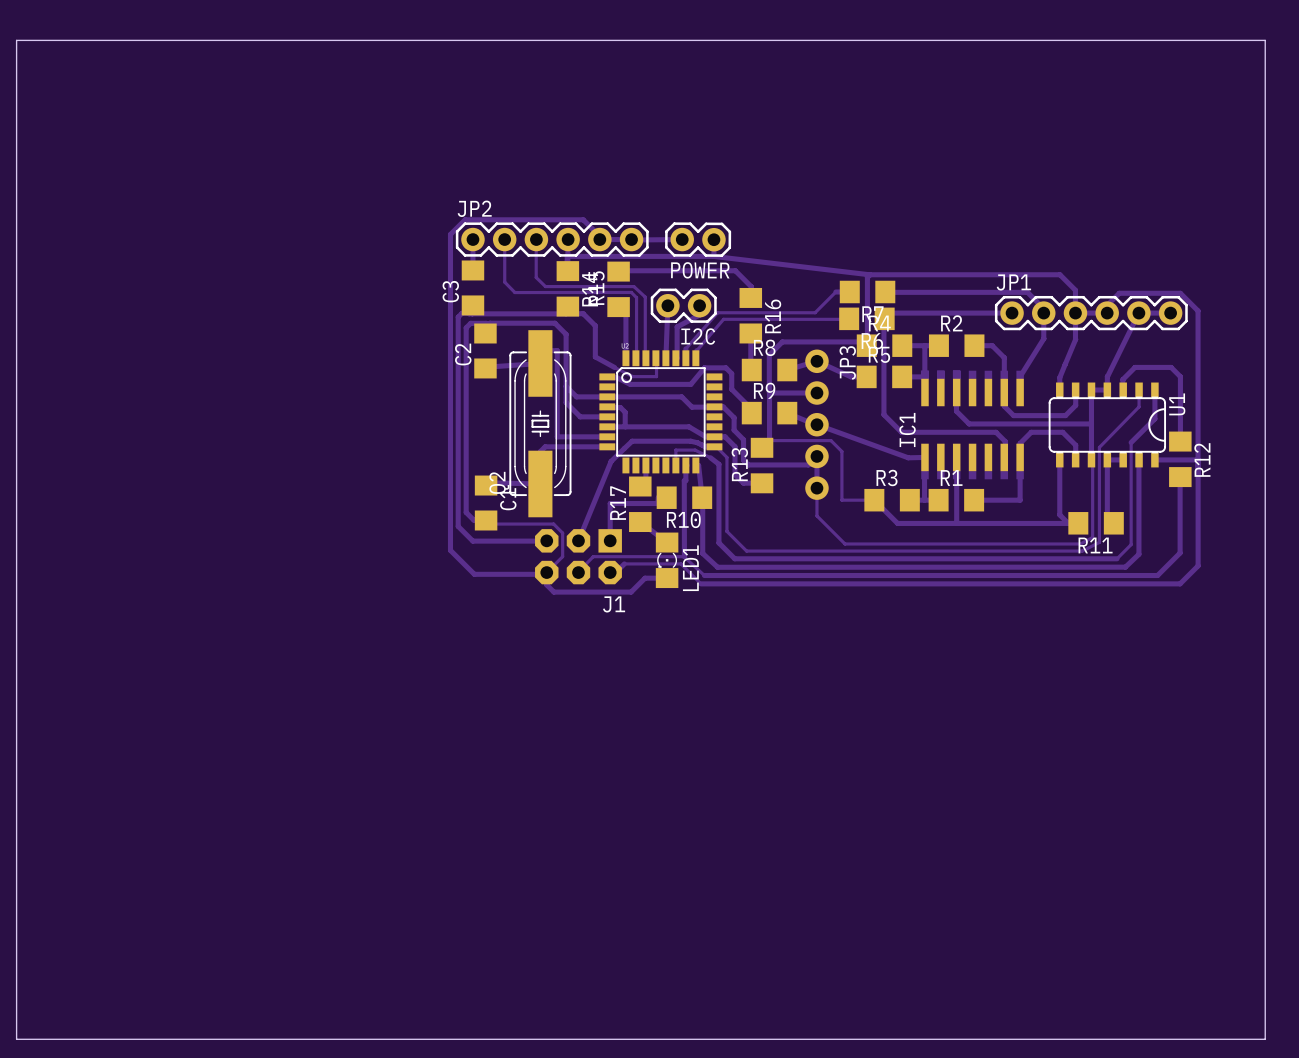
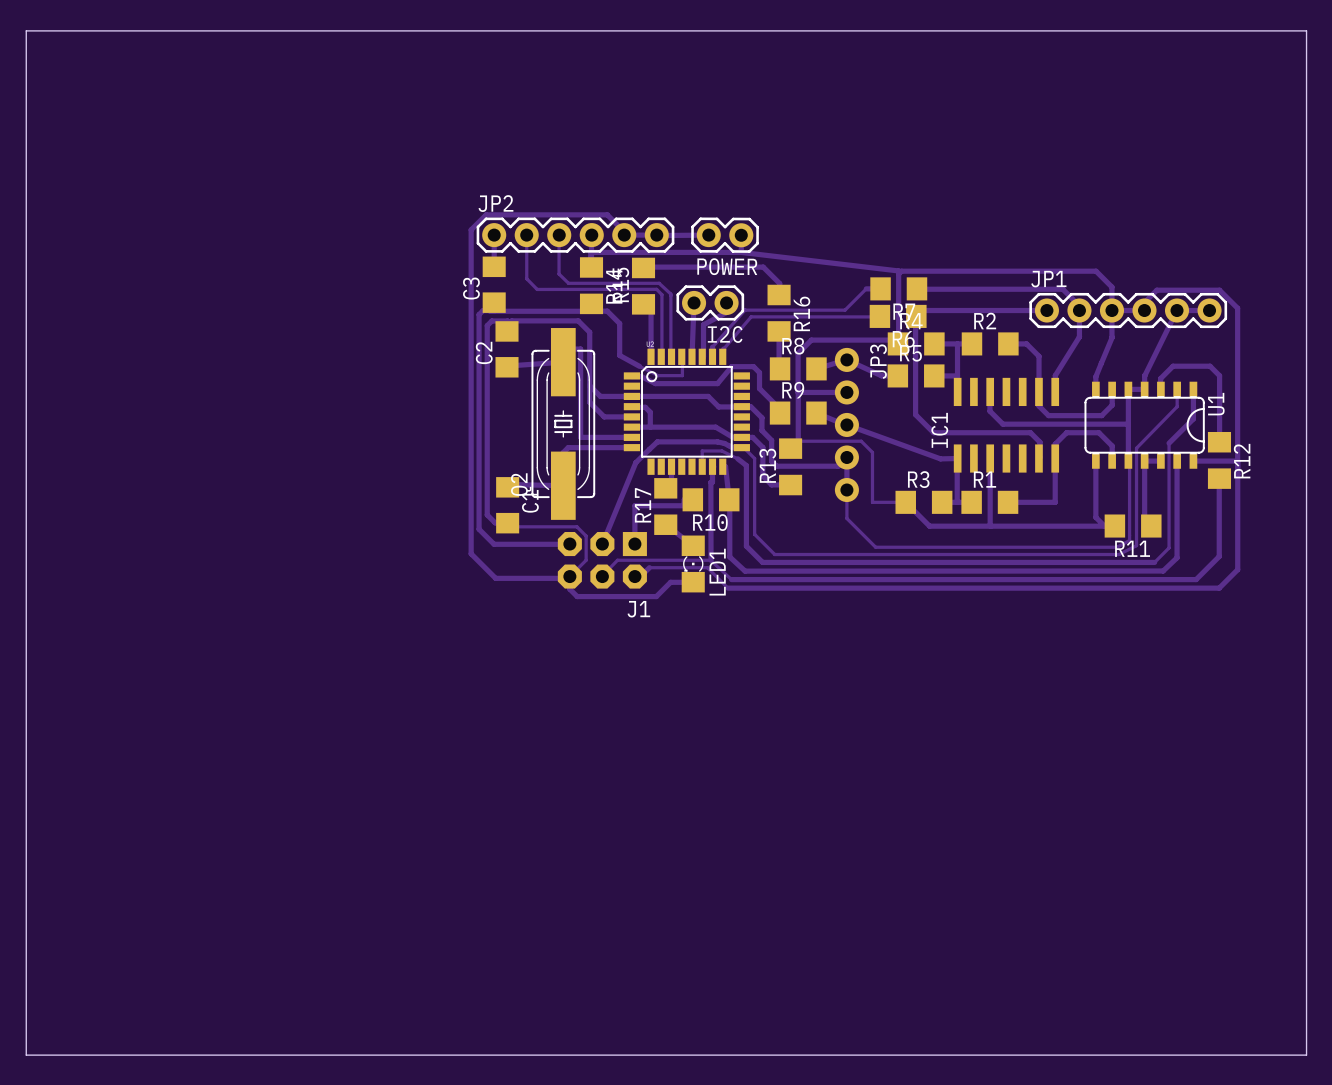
drawing: [921, 370, 1024, 379] -> none
drawing: [921, 471, 1024, 480] -> none

